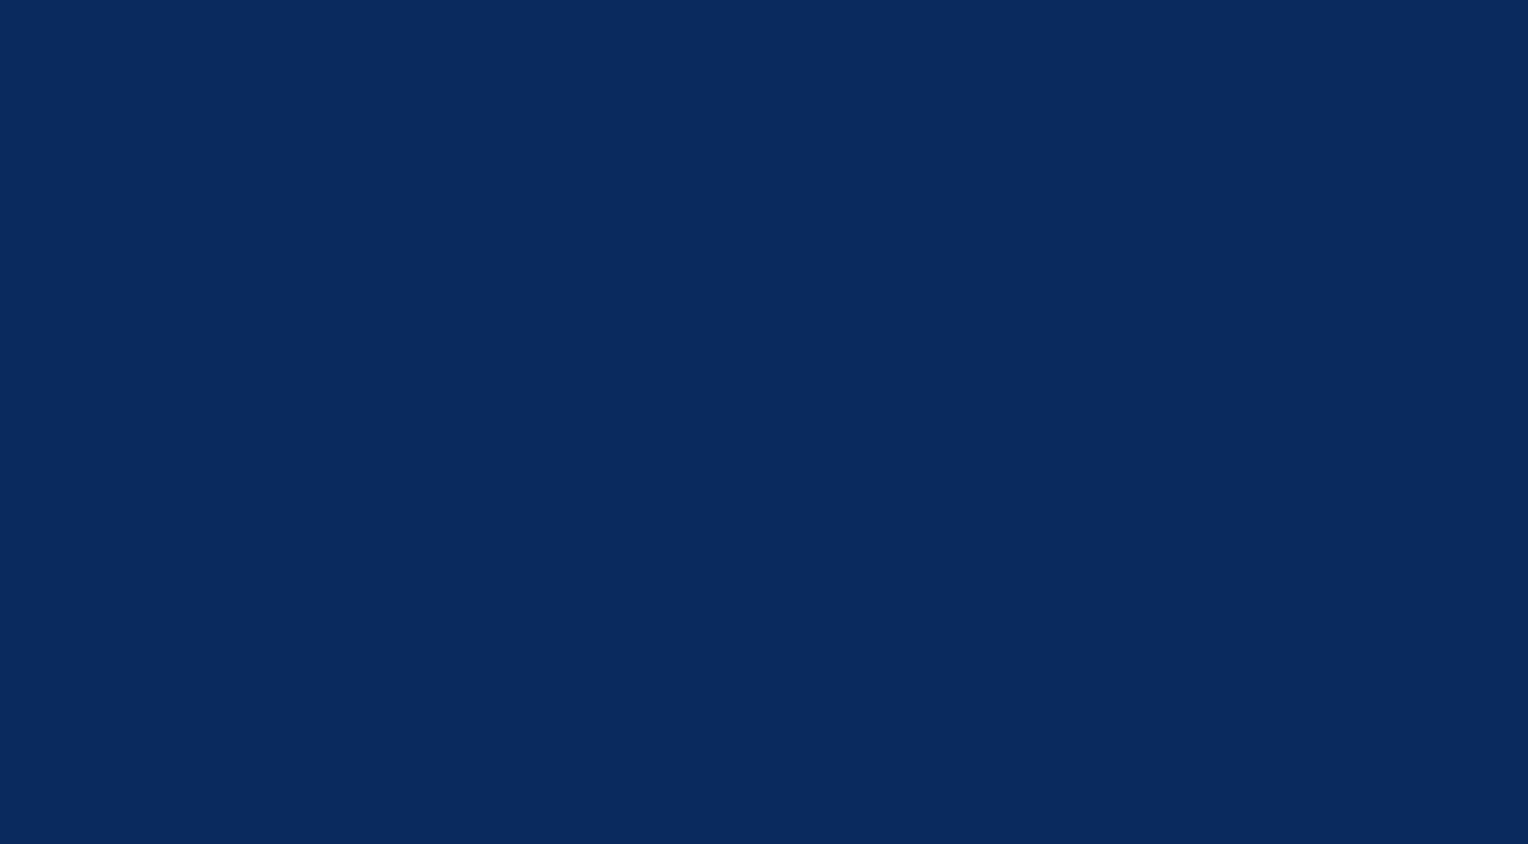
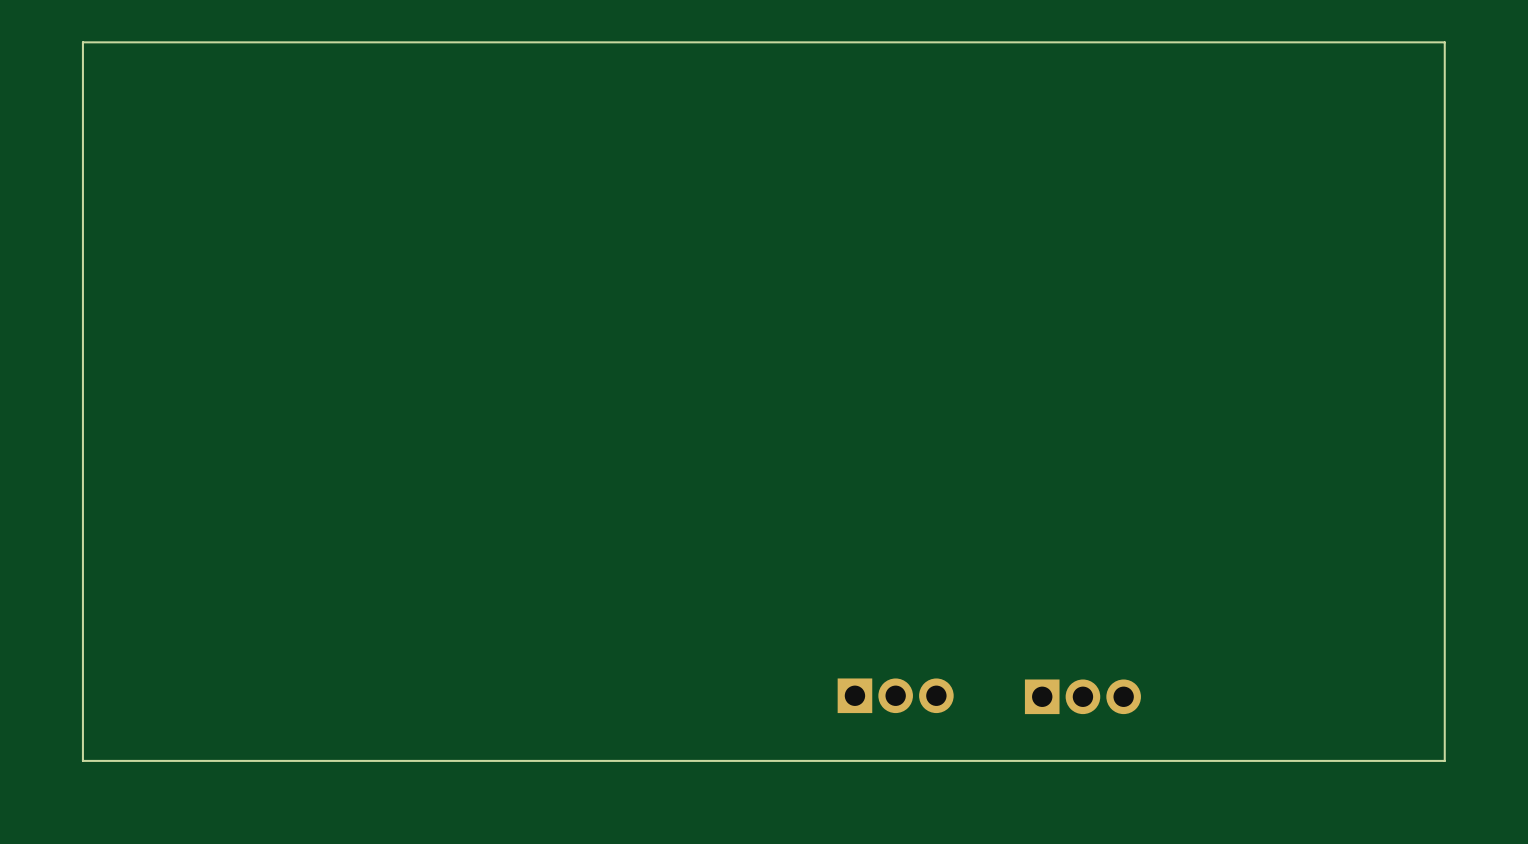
board edge: none -> (1444, 42) (82, 42) (82, 760) (1444, 760) (1444, 42)
part: none -> (895, 695)
part: none -> (1082, 696)

